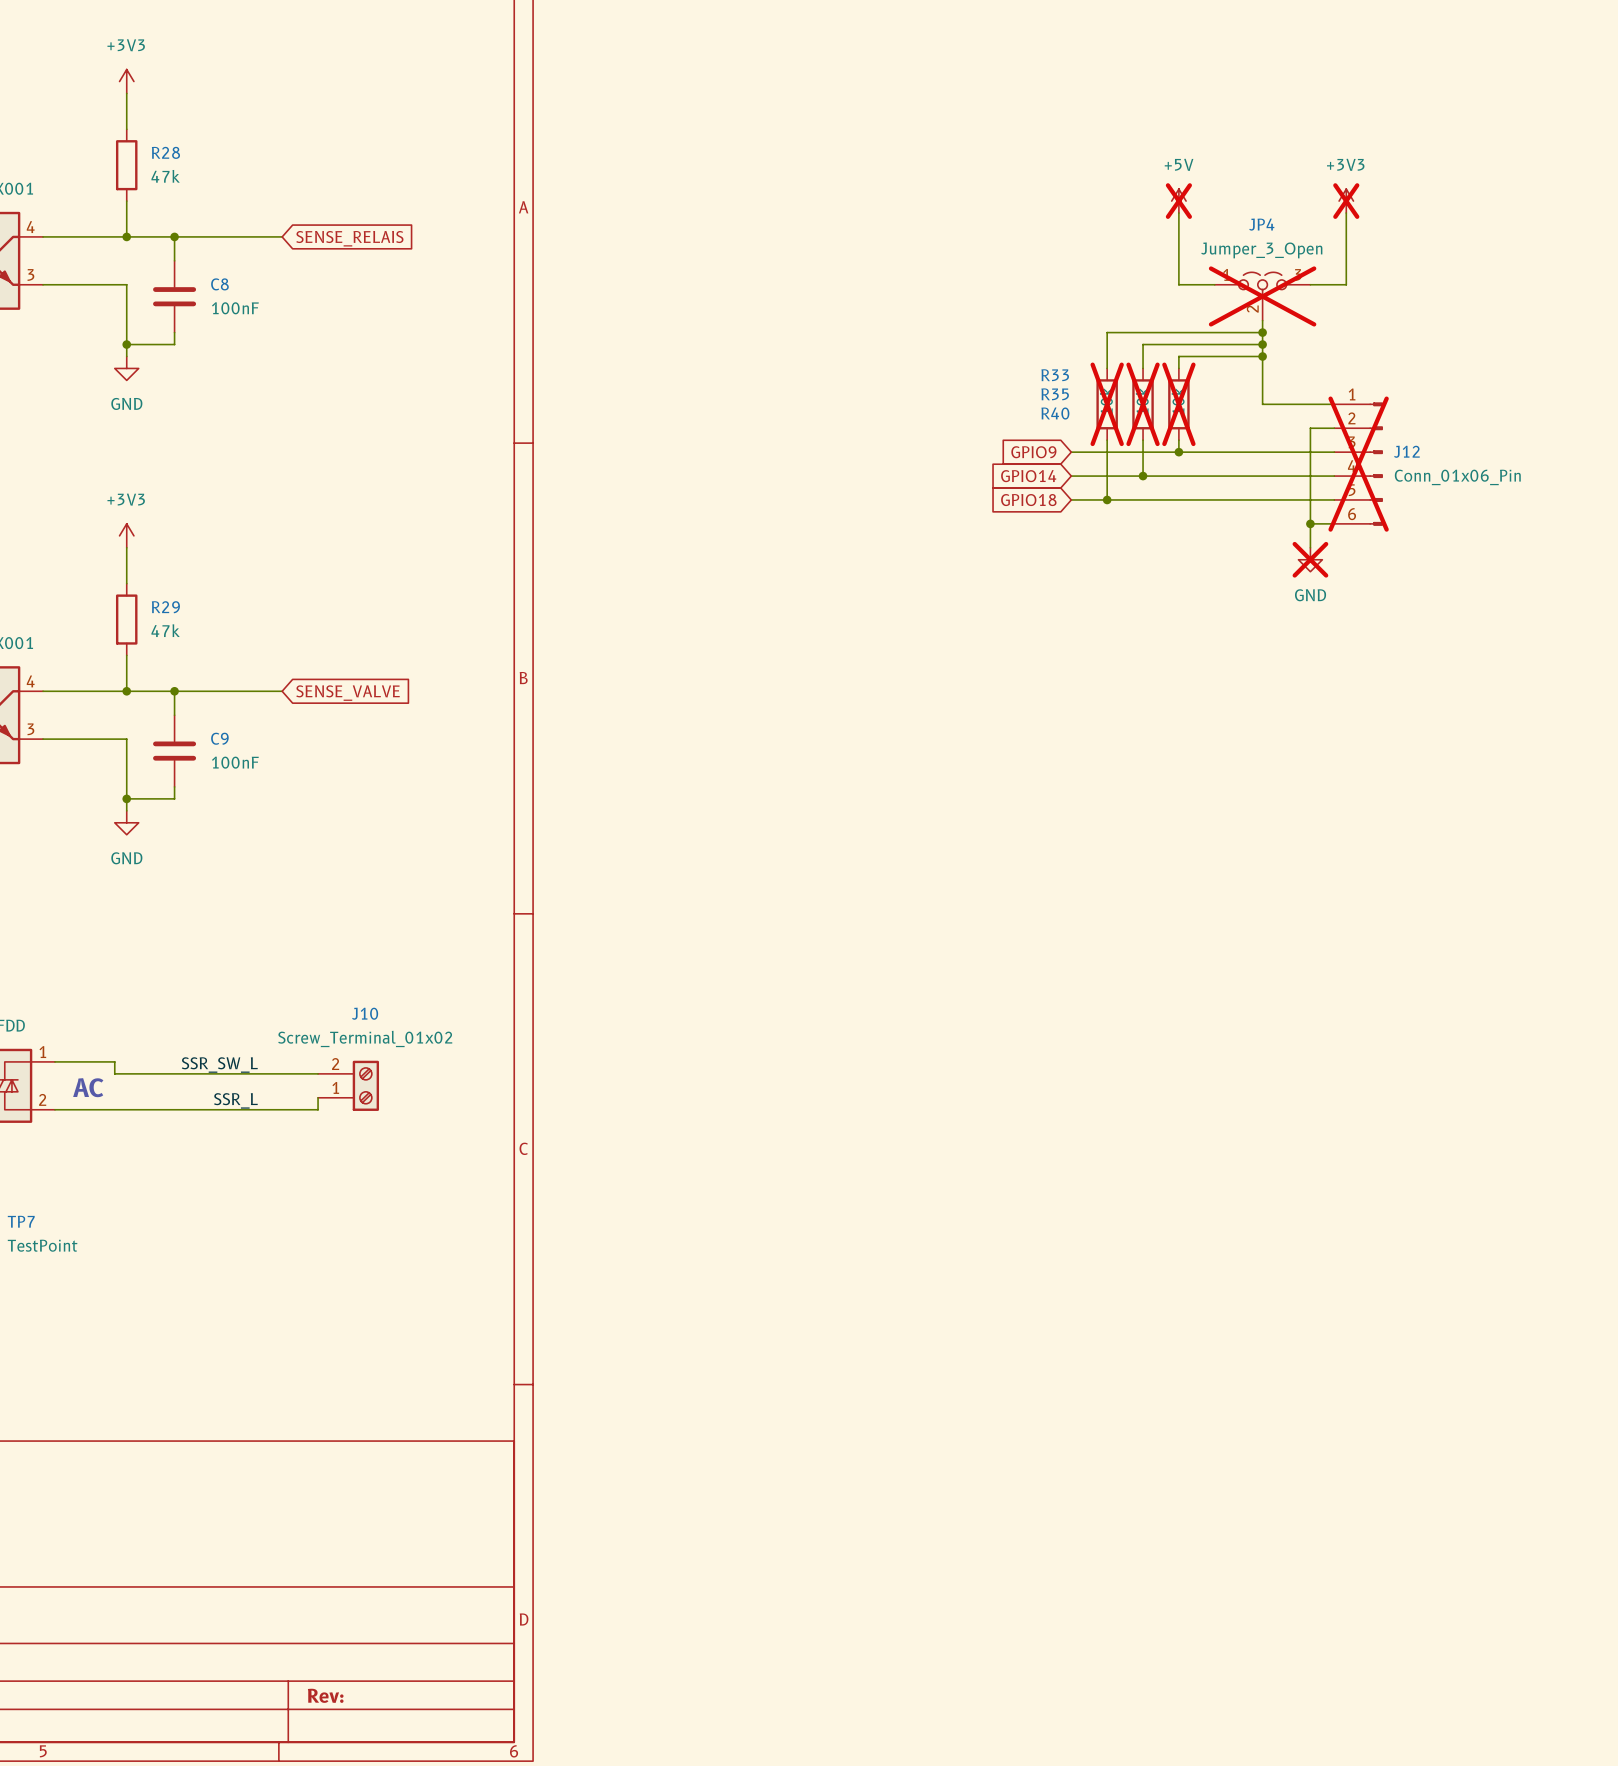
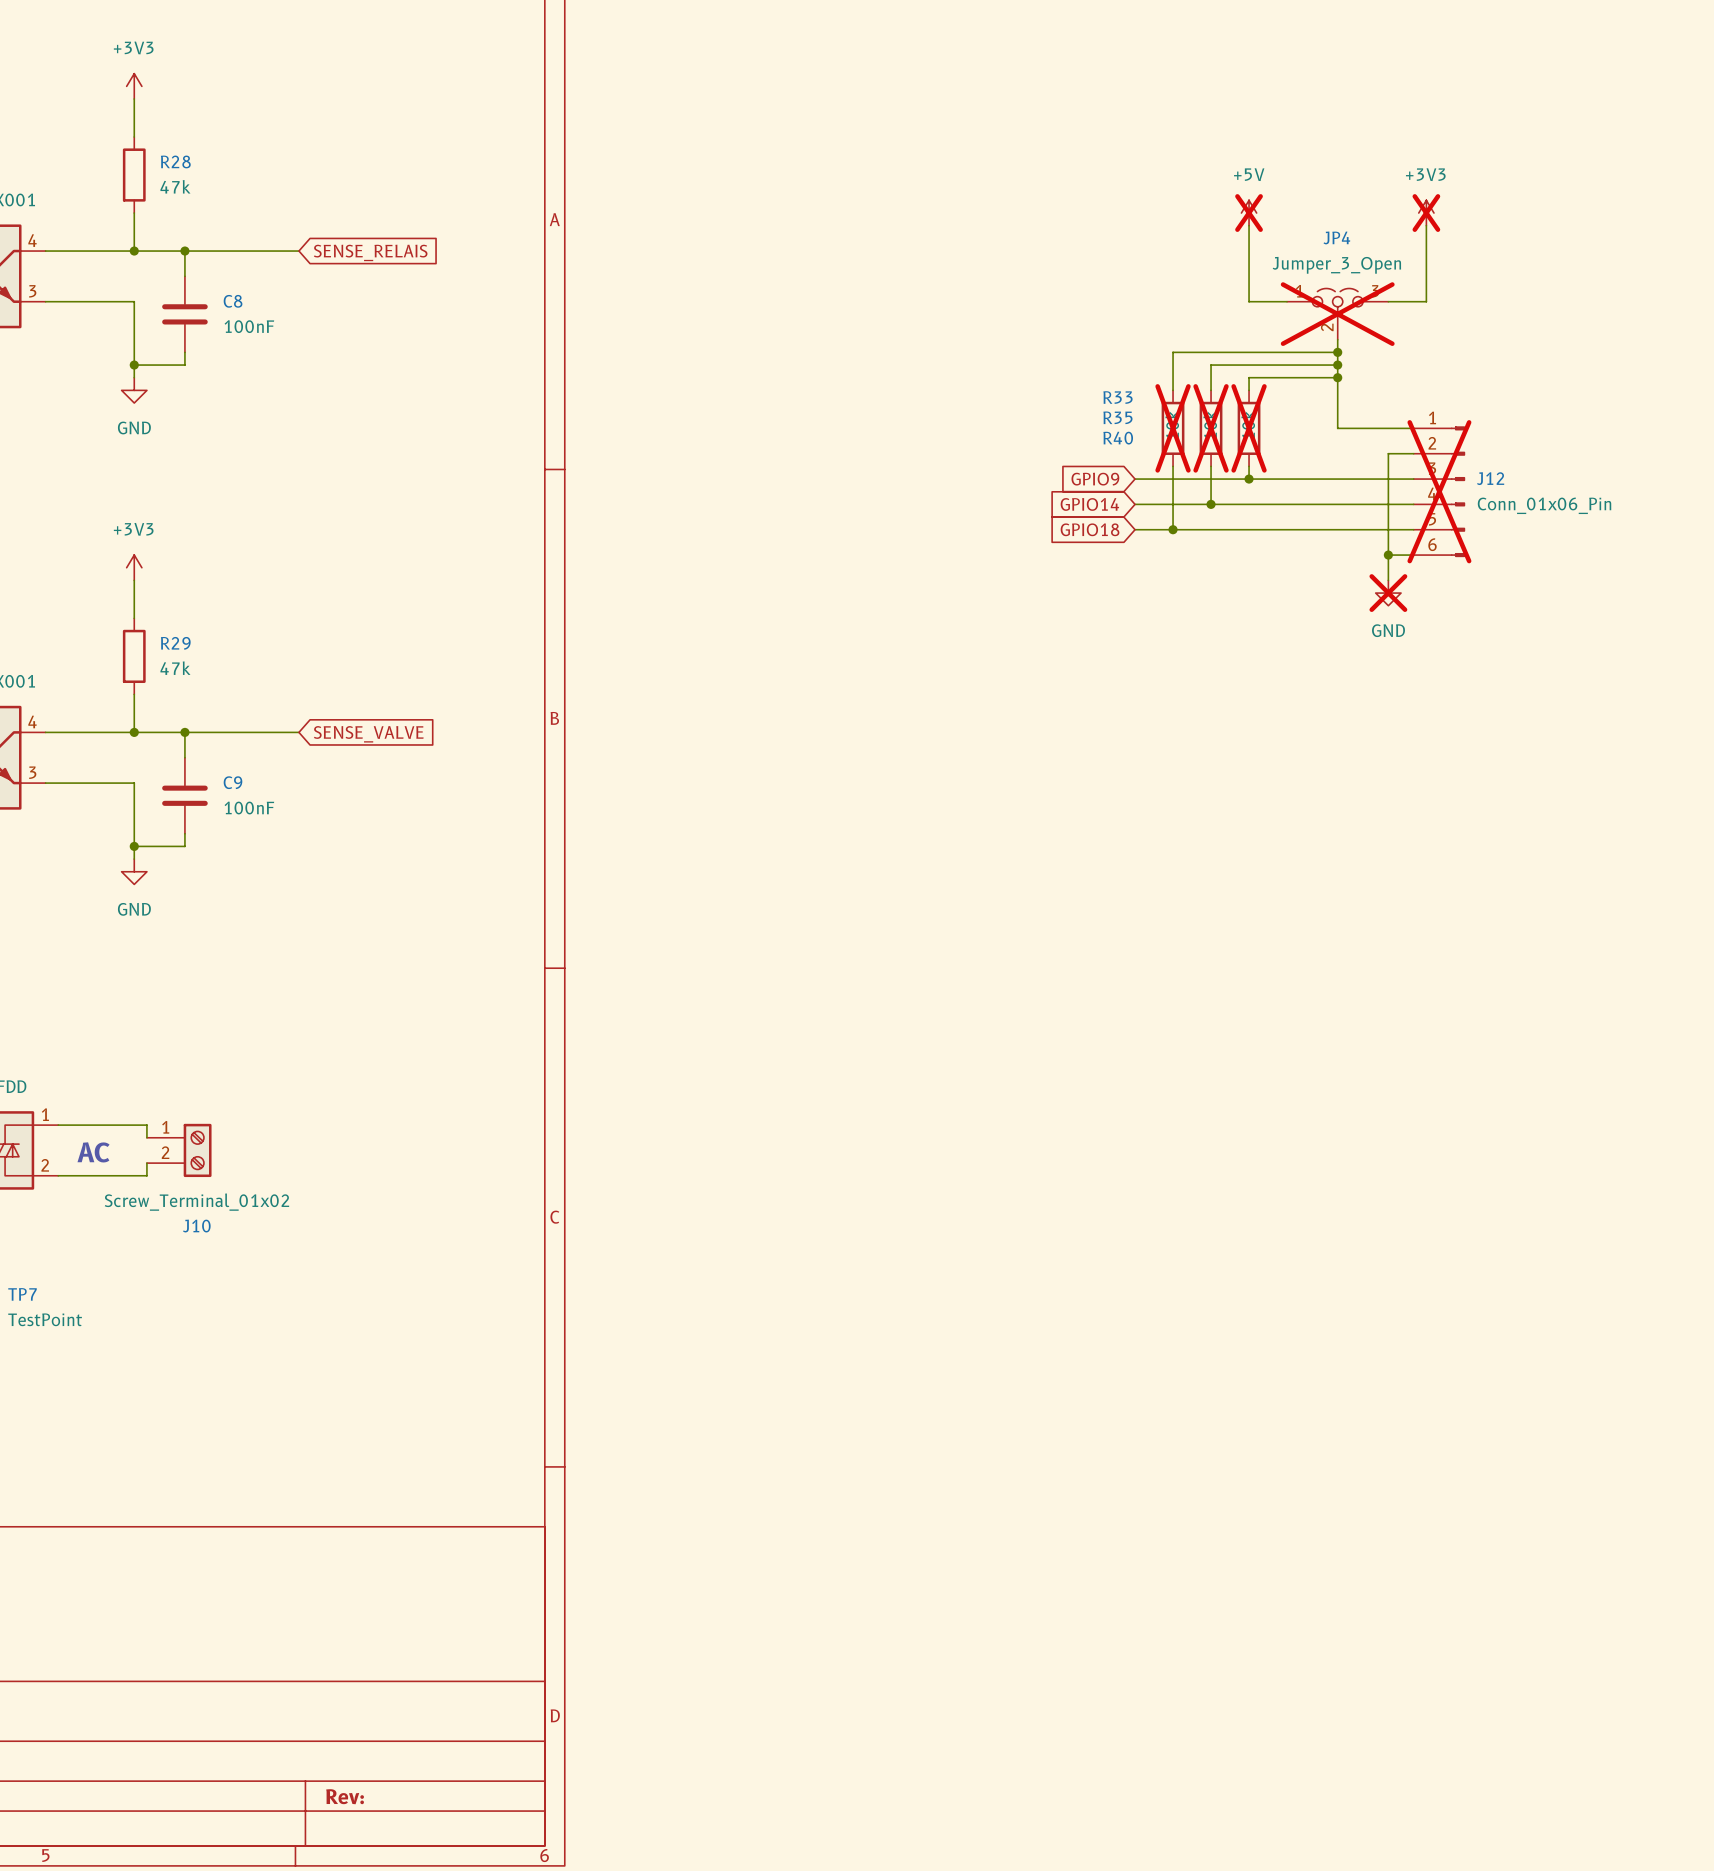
wire: (114, 1061) (114, 1073) (318, 1073) -> (121, 1125) (146, 1125) (146, 1137)
label: SSR_SW_L (219, 1065) -> none
J10 position: (348, 1085) -> (179, 1150)
J10 flip: as is (365, 1085) -> up-down (197, 1150)
wire: (318, 1097) (318, 1109) (138, 1109) -> (146, 1163) (146, 1175)
label: SSR_L (235, 1100) -> none

